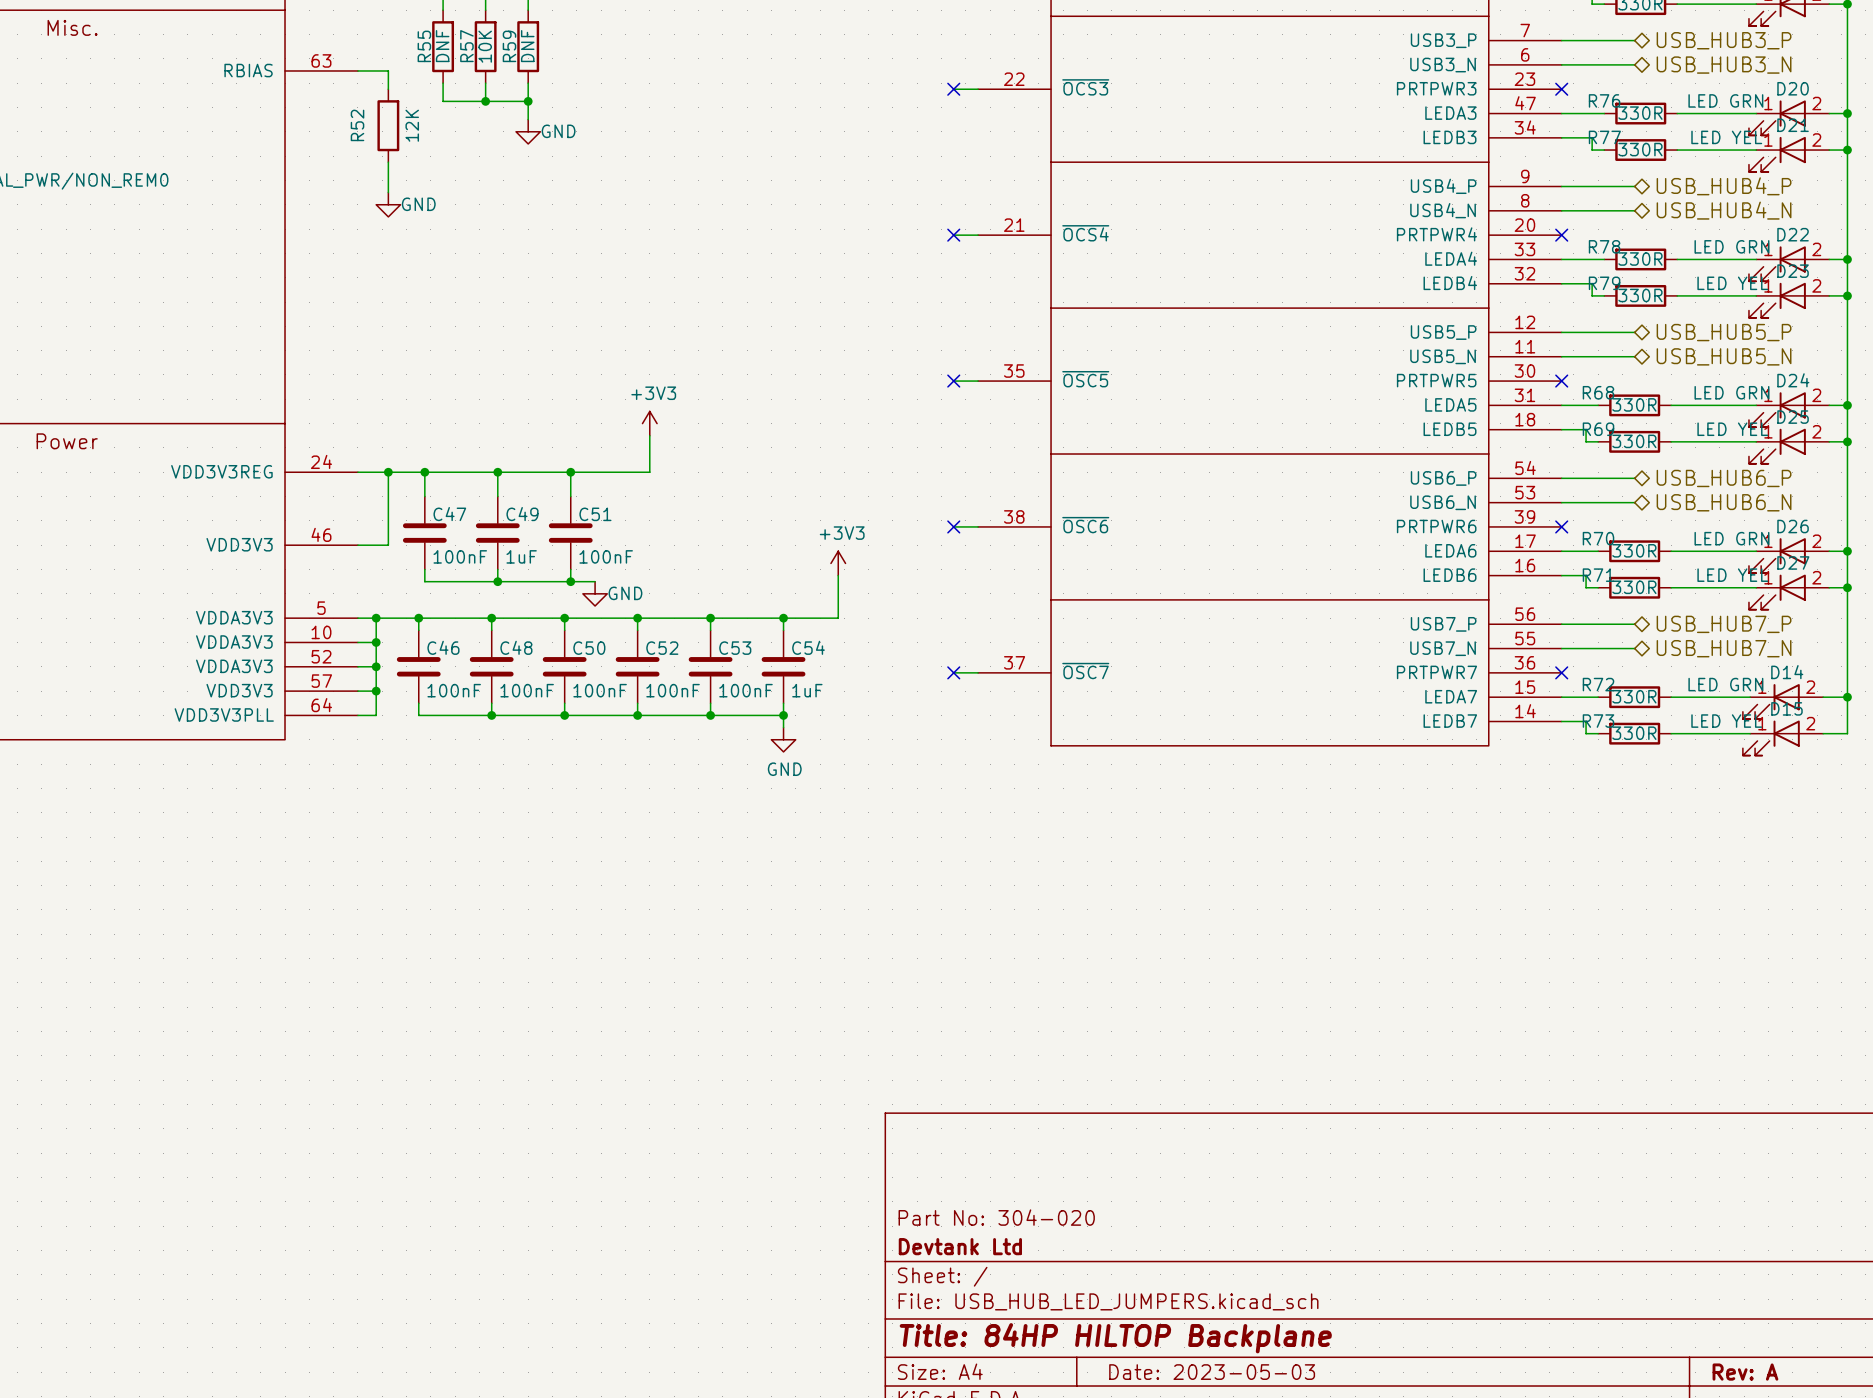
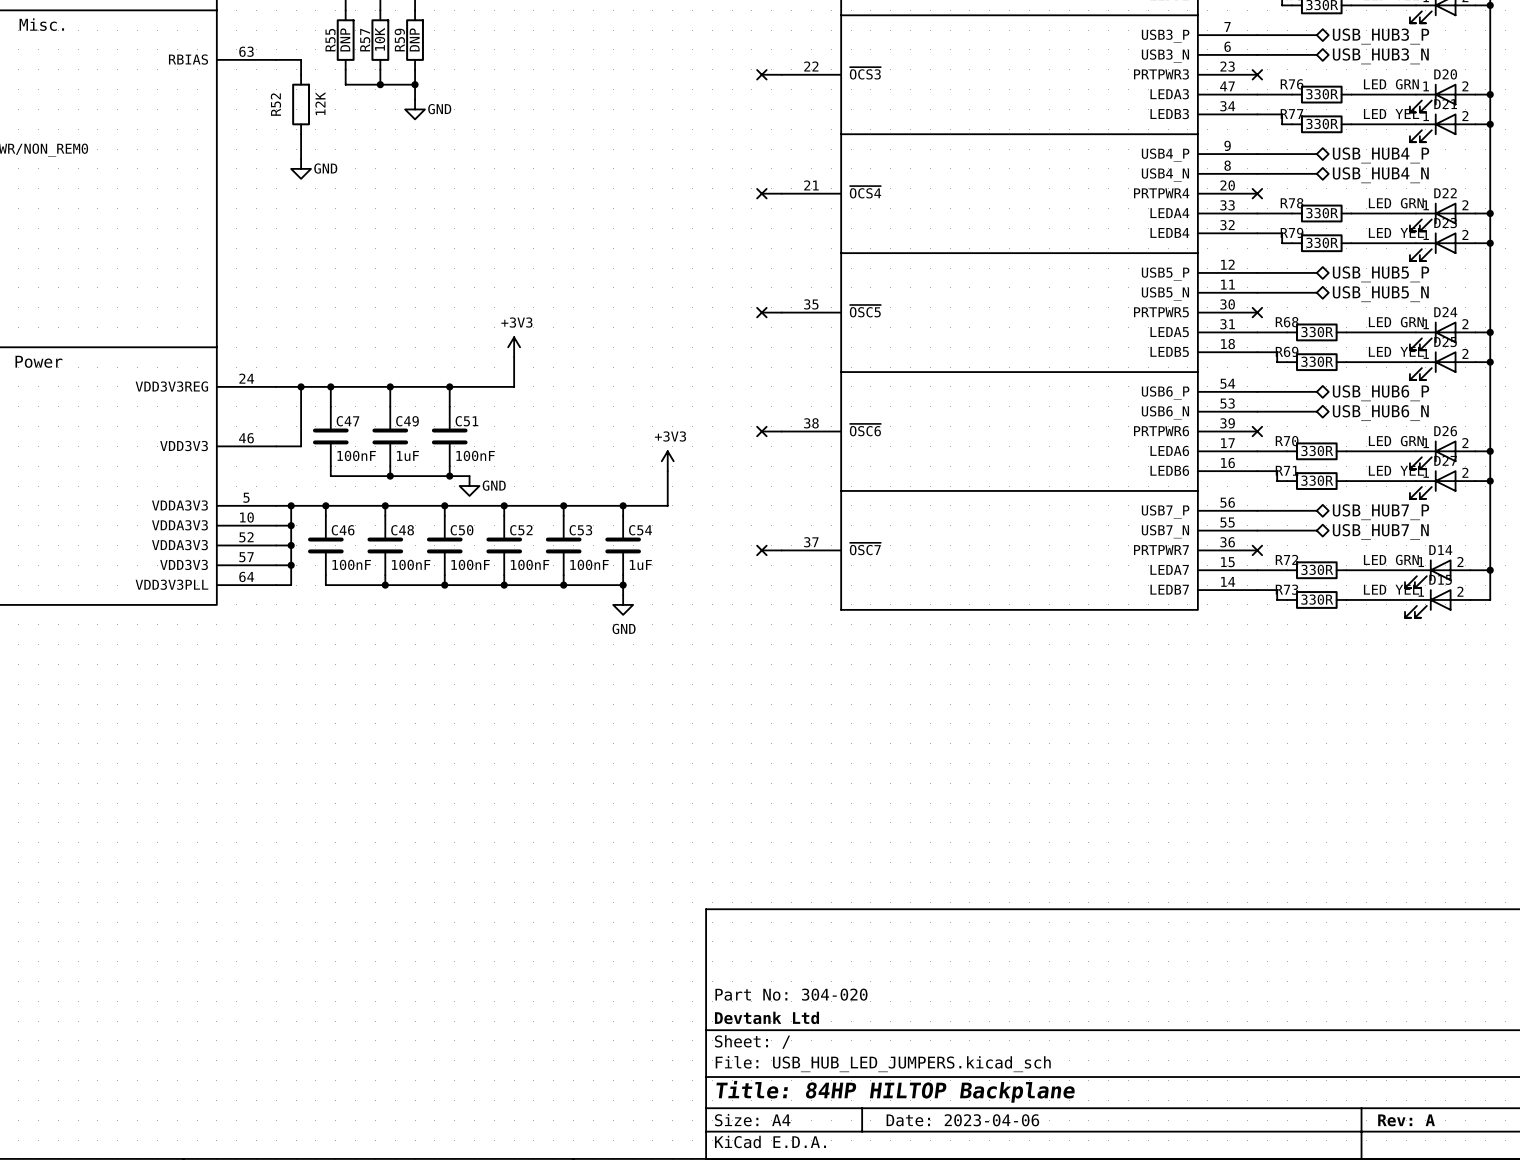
R55 value: DNF (442, 46) -> DNP (345, 39)
R59 value: DNF (527, 46) -> DNP (414, 39)
title block: Date: 2023-05-03 (1212, 1372) -> Date: 2023-04-06 (962, 1120)

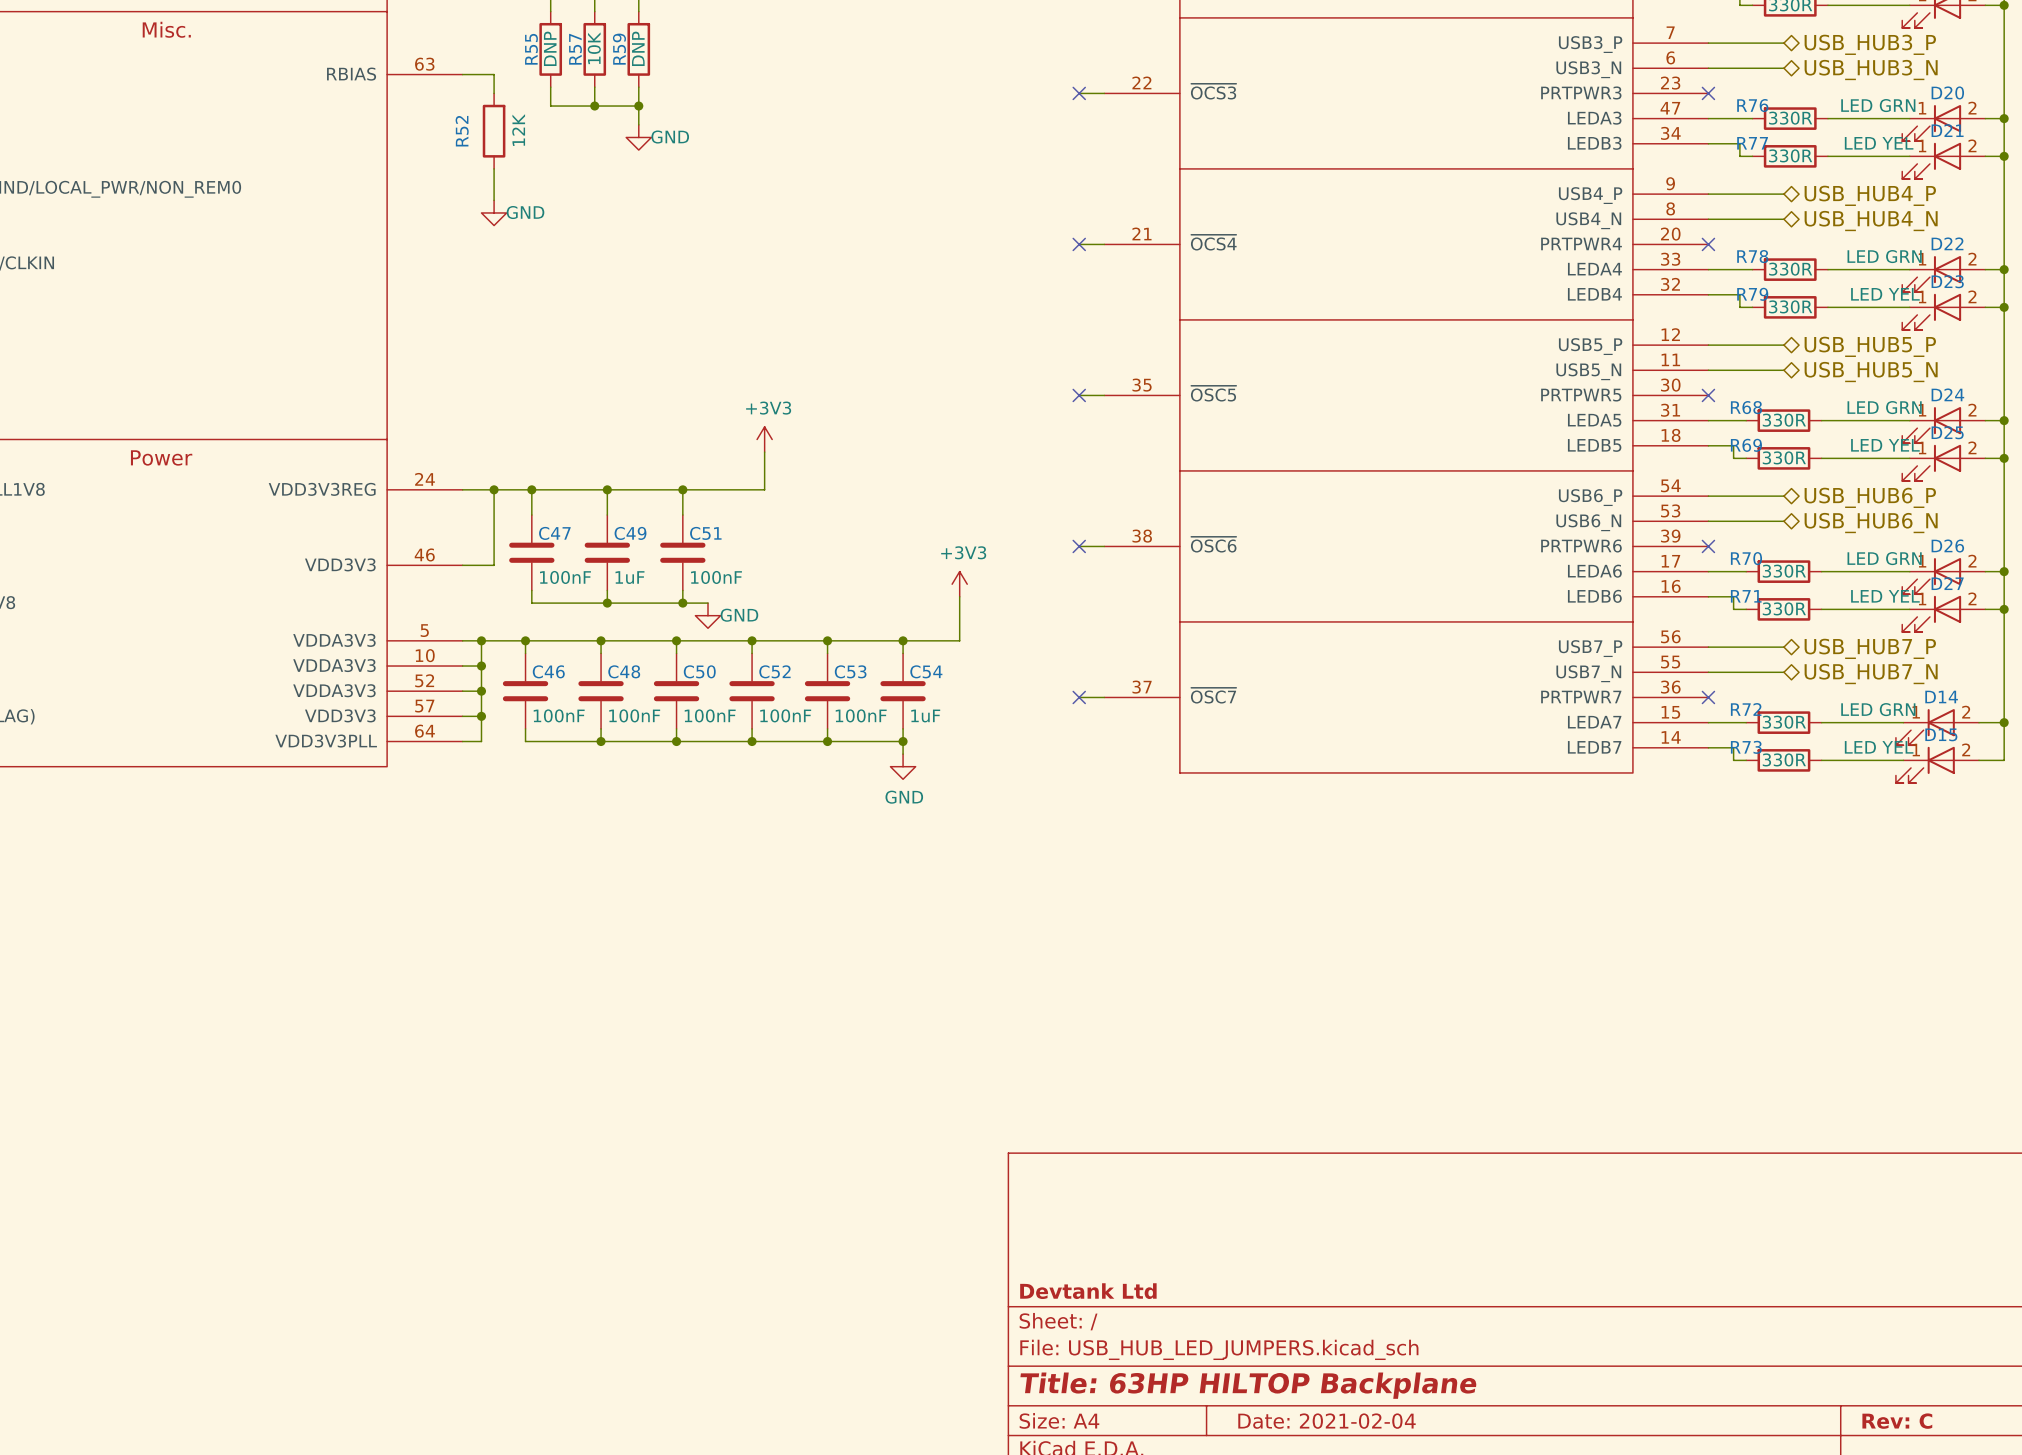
title block: Part No: 304-020 (791, 994) -> none
title block: Title: 84HP HILTOP Backplane (895, 1091) -> Title: 63HP HILTOP Backplane (1248, 1385)
title block: Date: 2023-04-06 (962, 1120) -> Date: 2021-02-04 (1326, 1421)
title block: Rev: A (1406, 1120) -> Rev: C (1897, 1421)

